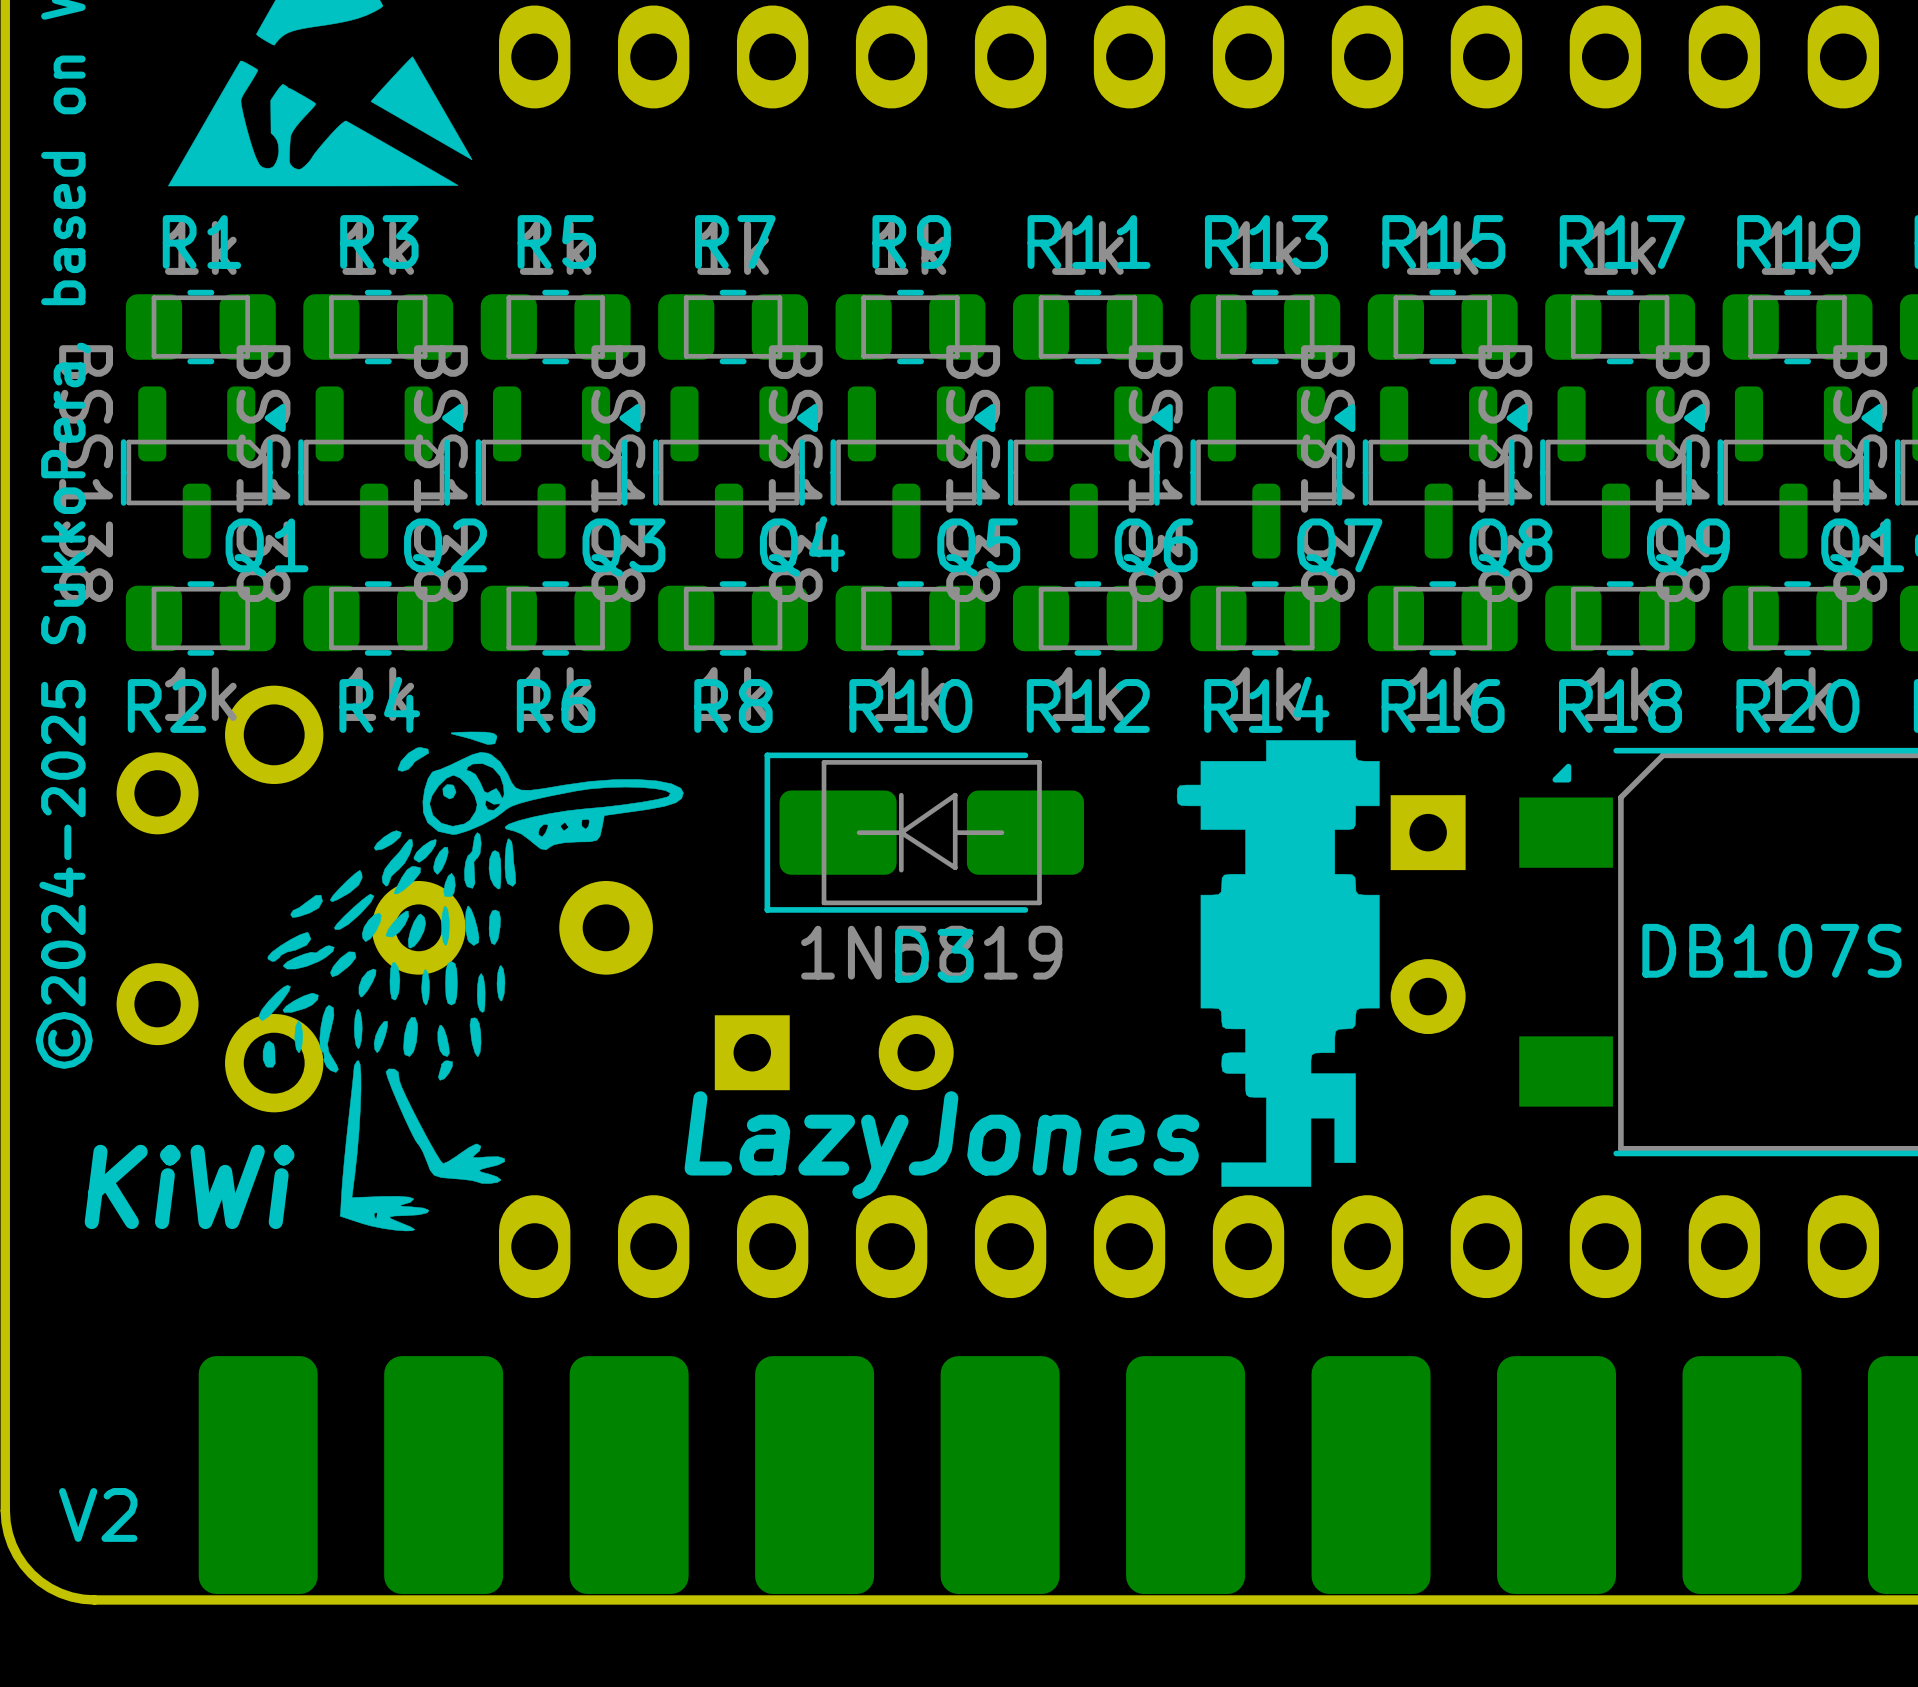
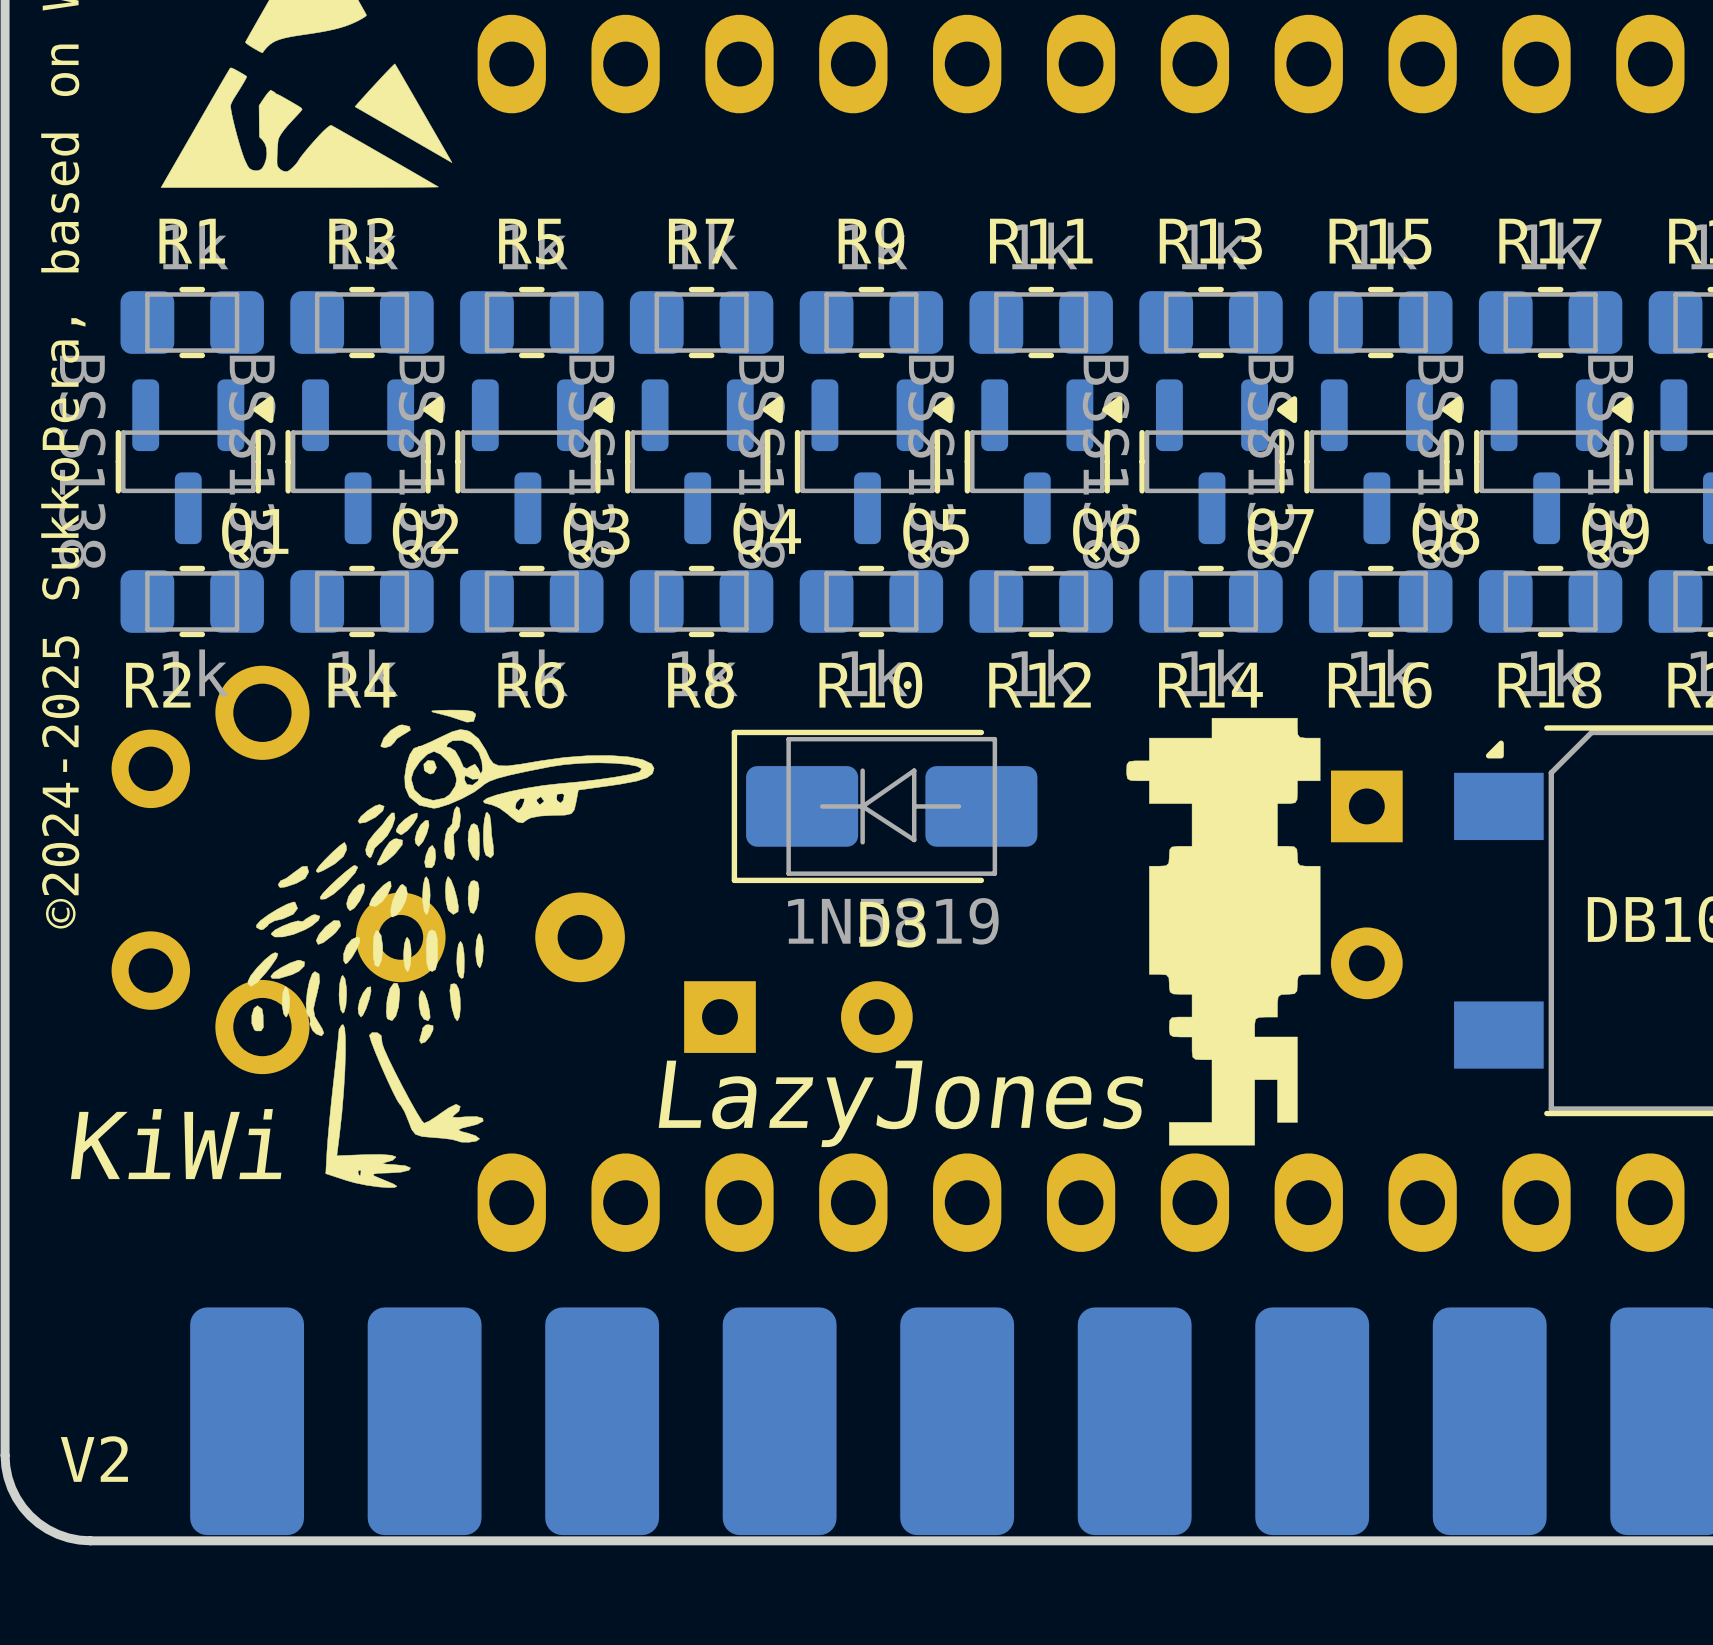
part position: (512, 927) -> (490, 937)

